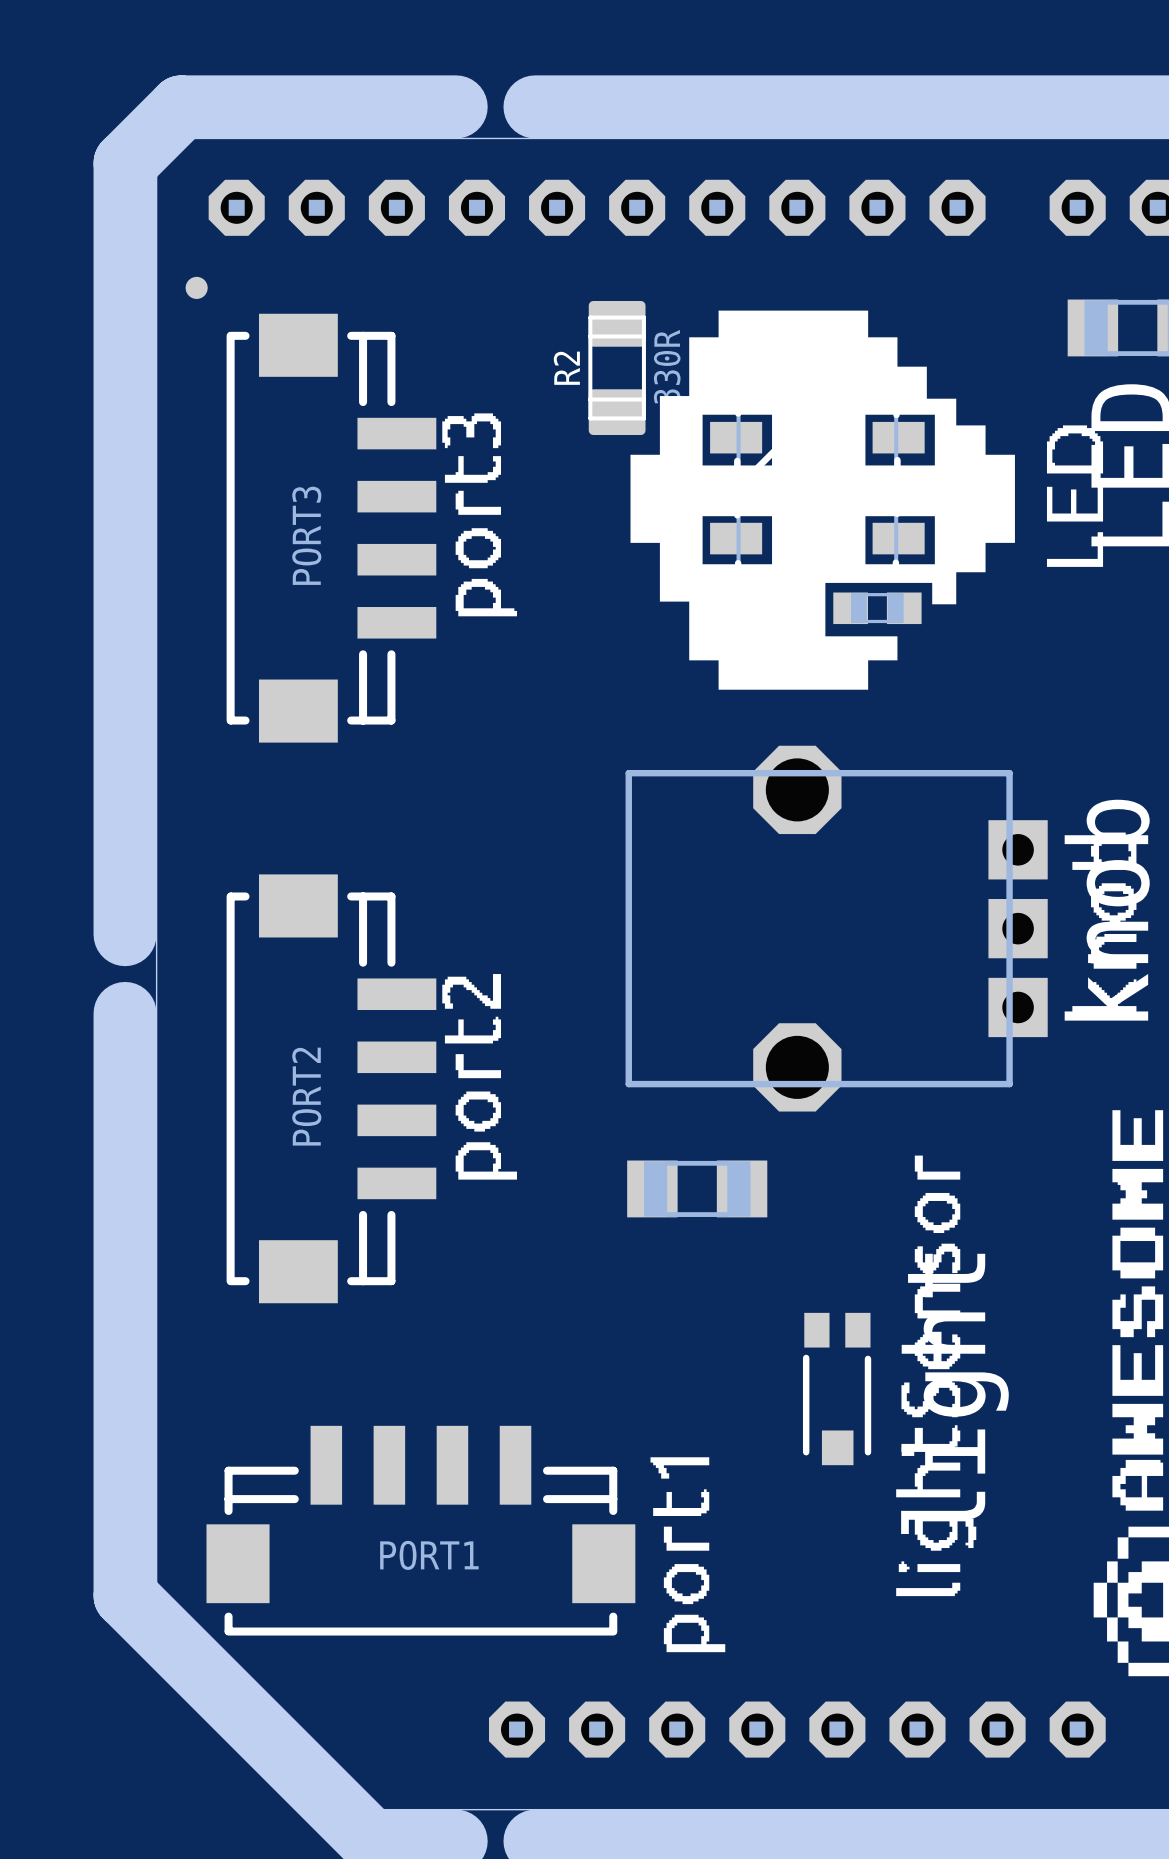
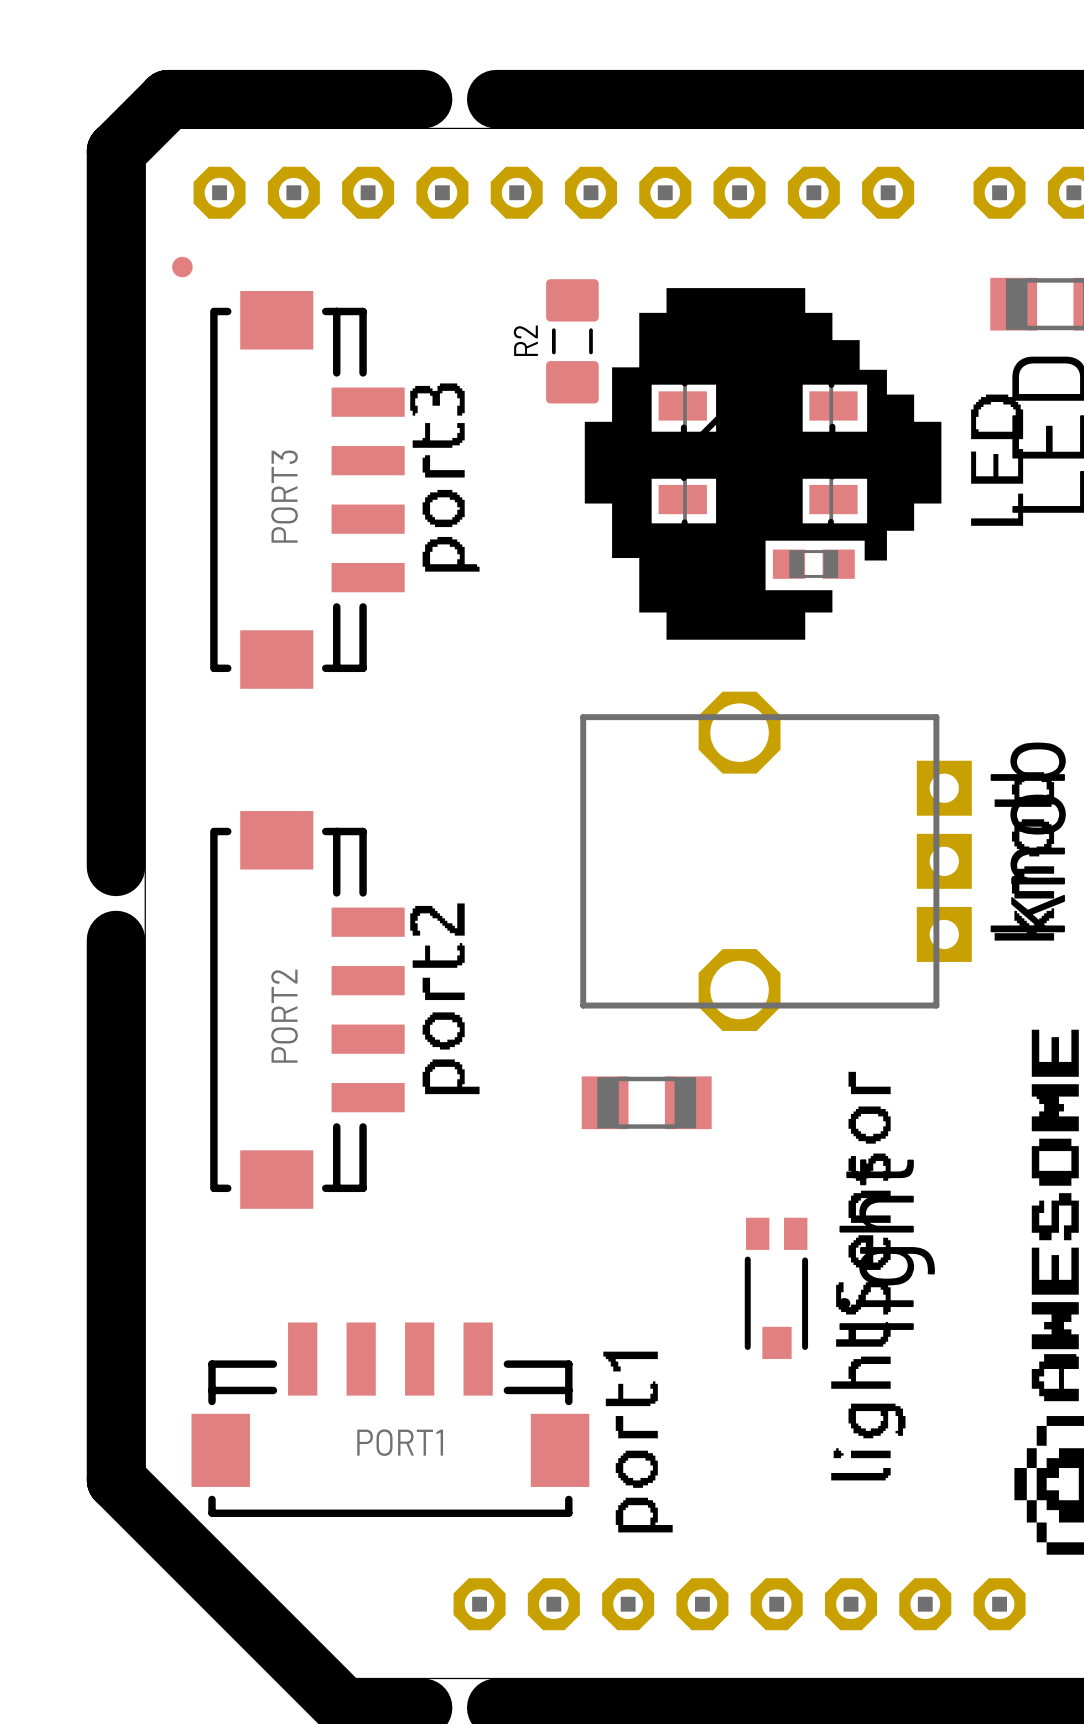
R2 footprint: [588, 300, 646, 436] -> [546, 279, 599, 404]
R2 value: 330R (667, 366) -> none

